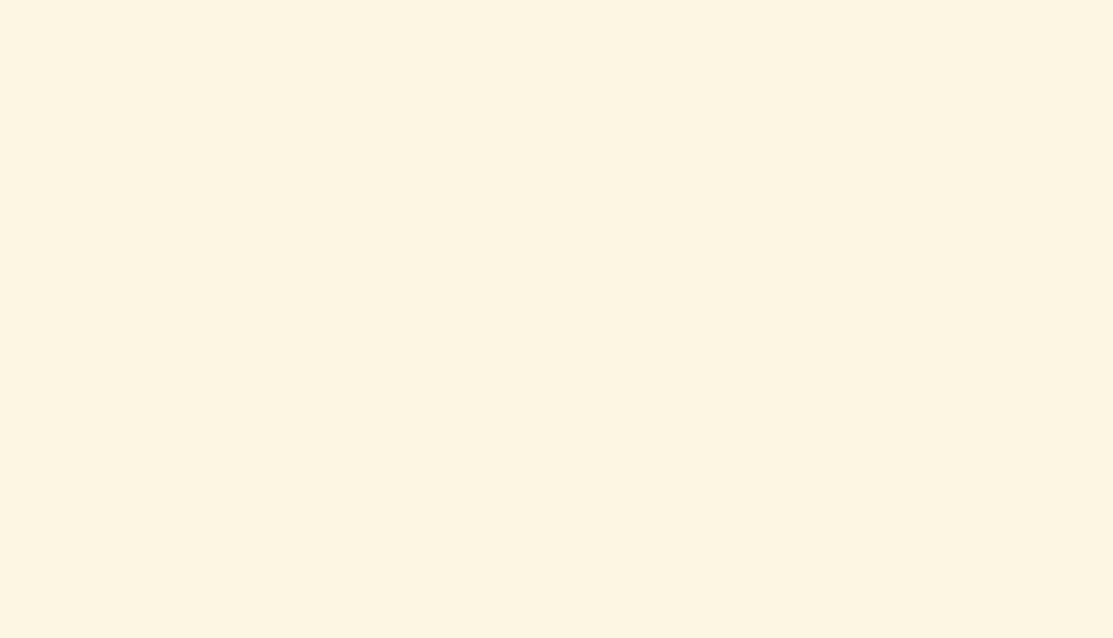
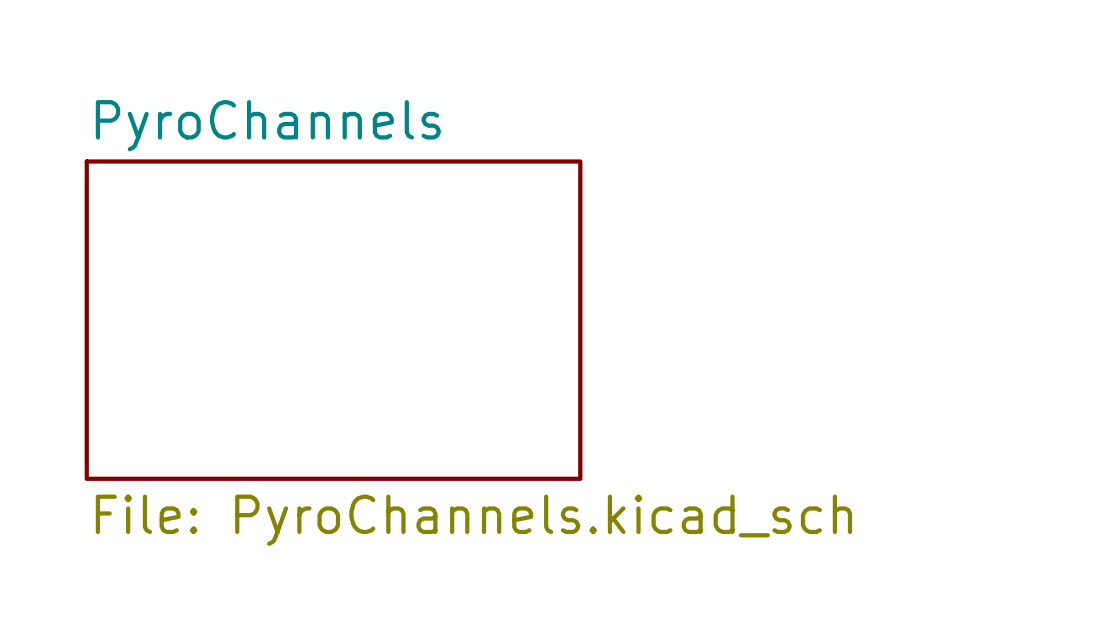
sheet PyroChannels: none -> File: PyroChannels.kicad_sch (333, 320)

